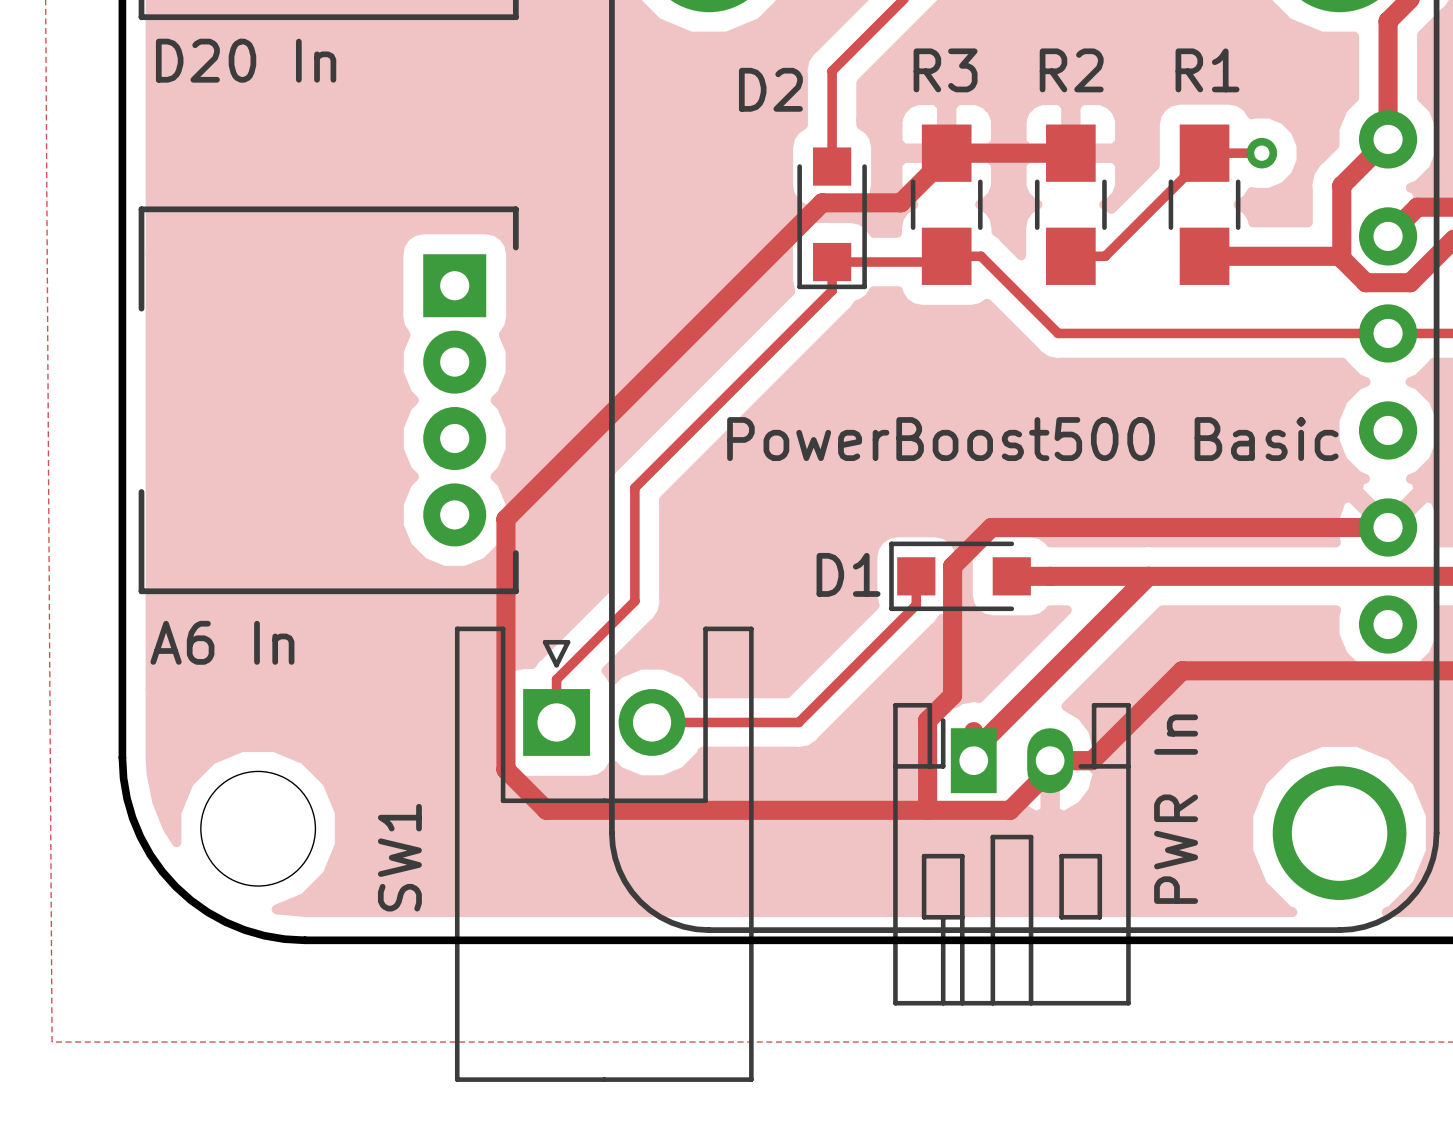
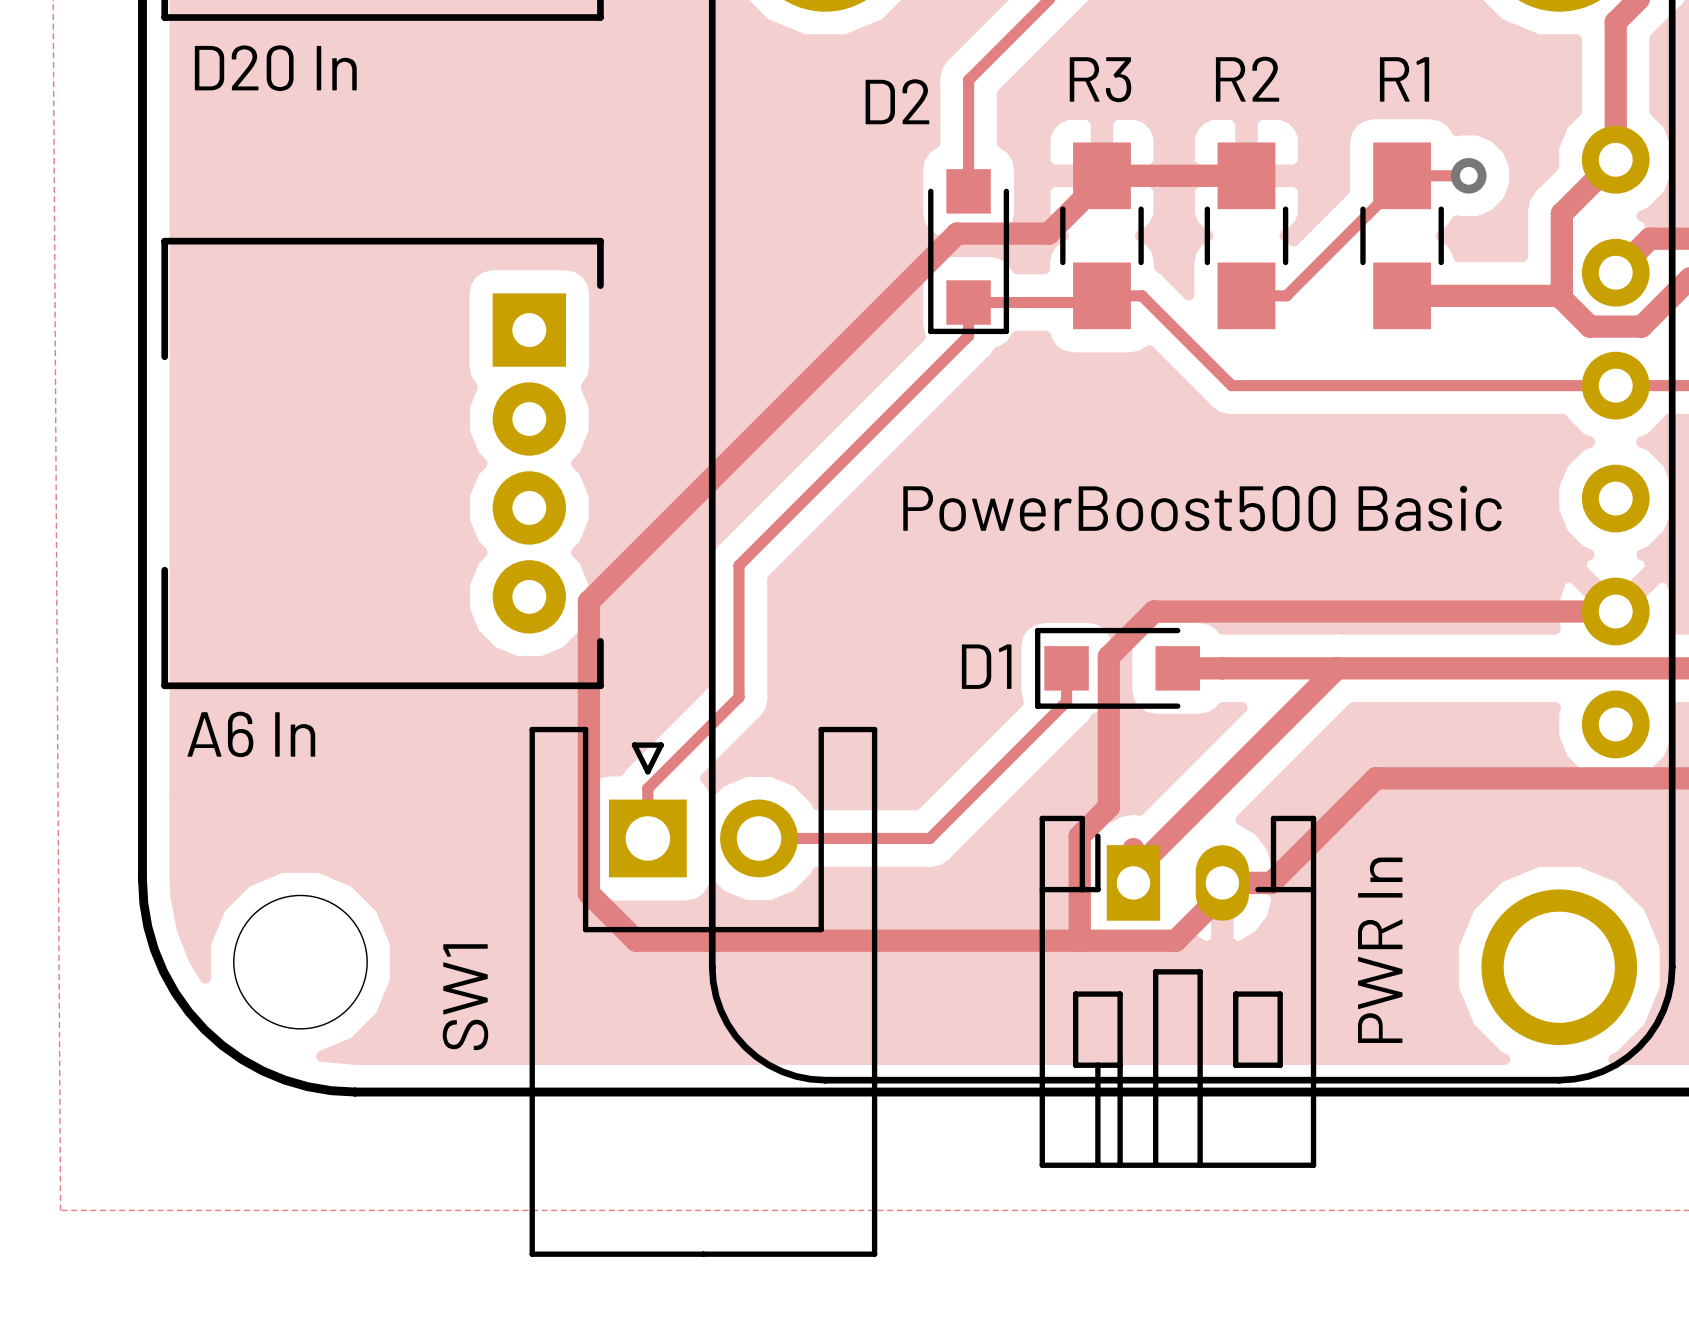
D20 In name: none -> D20 In (275, 68)
D20 In value: D20 In (246, 60) -> none
A6 In name: none -> A6 In (251, 734)
A6 In value: A6 In (222, 642) -> none
PWR In value: PWR In (1176, 809) -> none
PWR In name: none -> PWR In (1380, 950)

